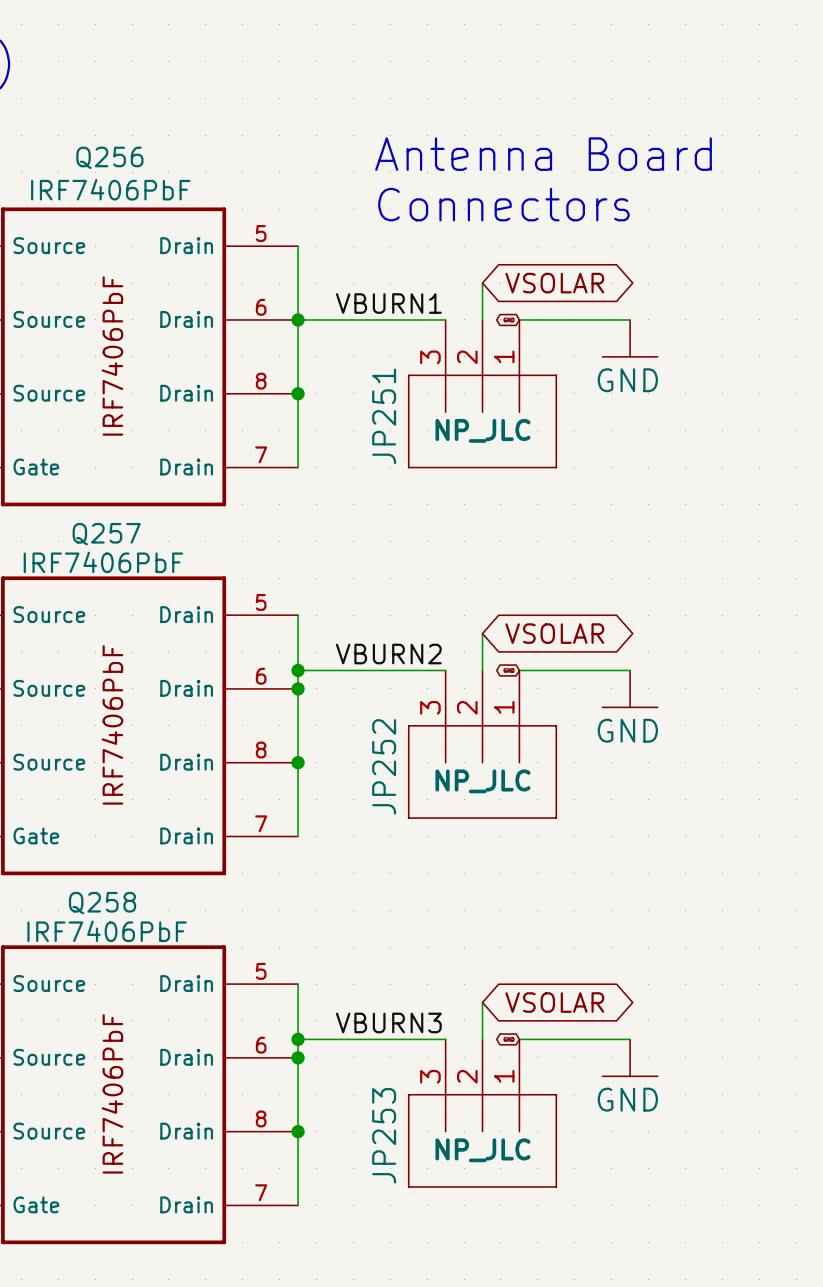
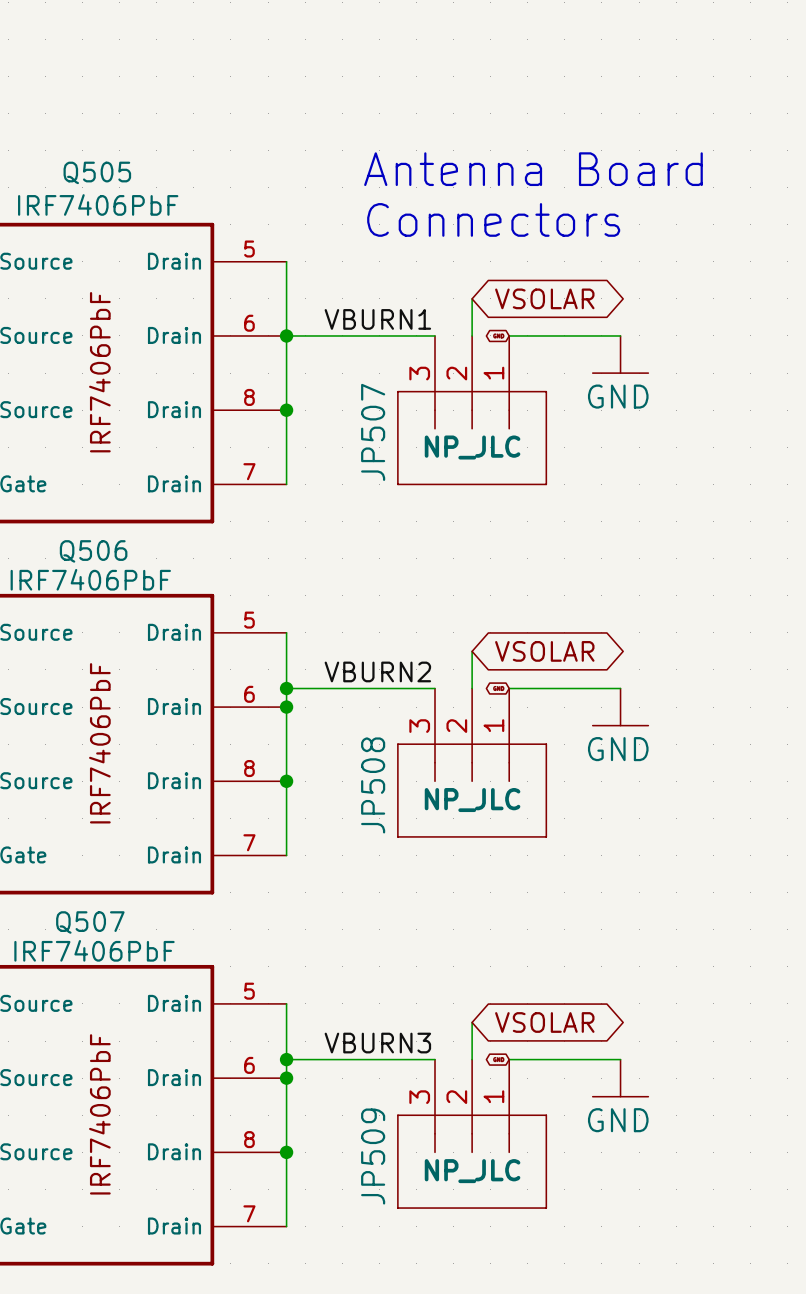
Q256 name: Q256 (109, 157) -> Q505 (97, 172)
JP251 name: JP251 (384, 416) -> JP507 (373, 432)
Q257 name: Q257 (106, 534) -> Q506 (93, 551)
JP252 name: JP252 (384, 766) -> JP508 (373, 785)
Q258 name: Q258 (102, 903) -> Q507 (90, 922)
JP253 name: JP253 (384, 1135) -> JP509 (373, 1156)

